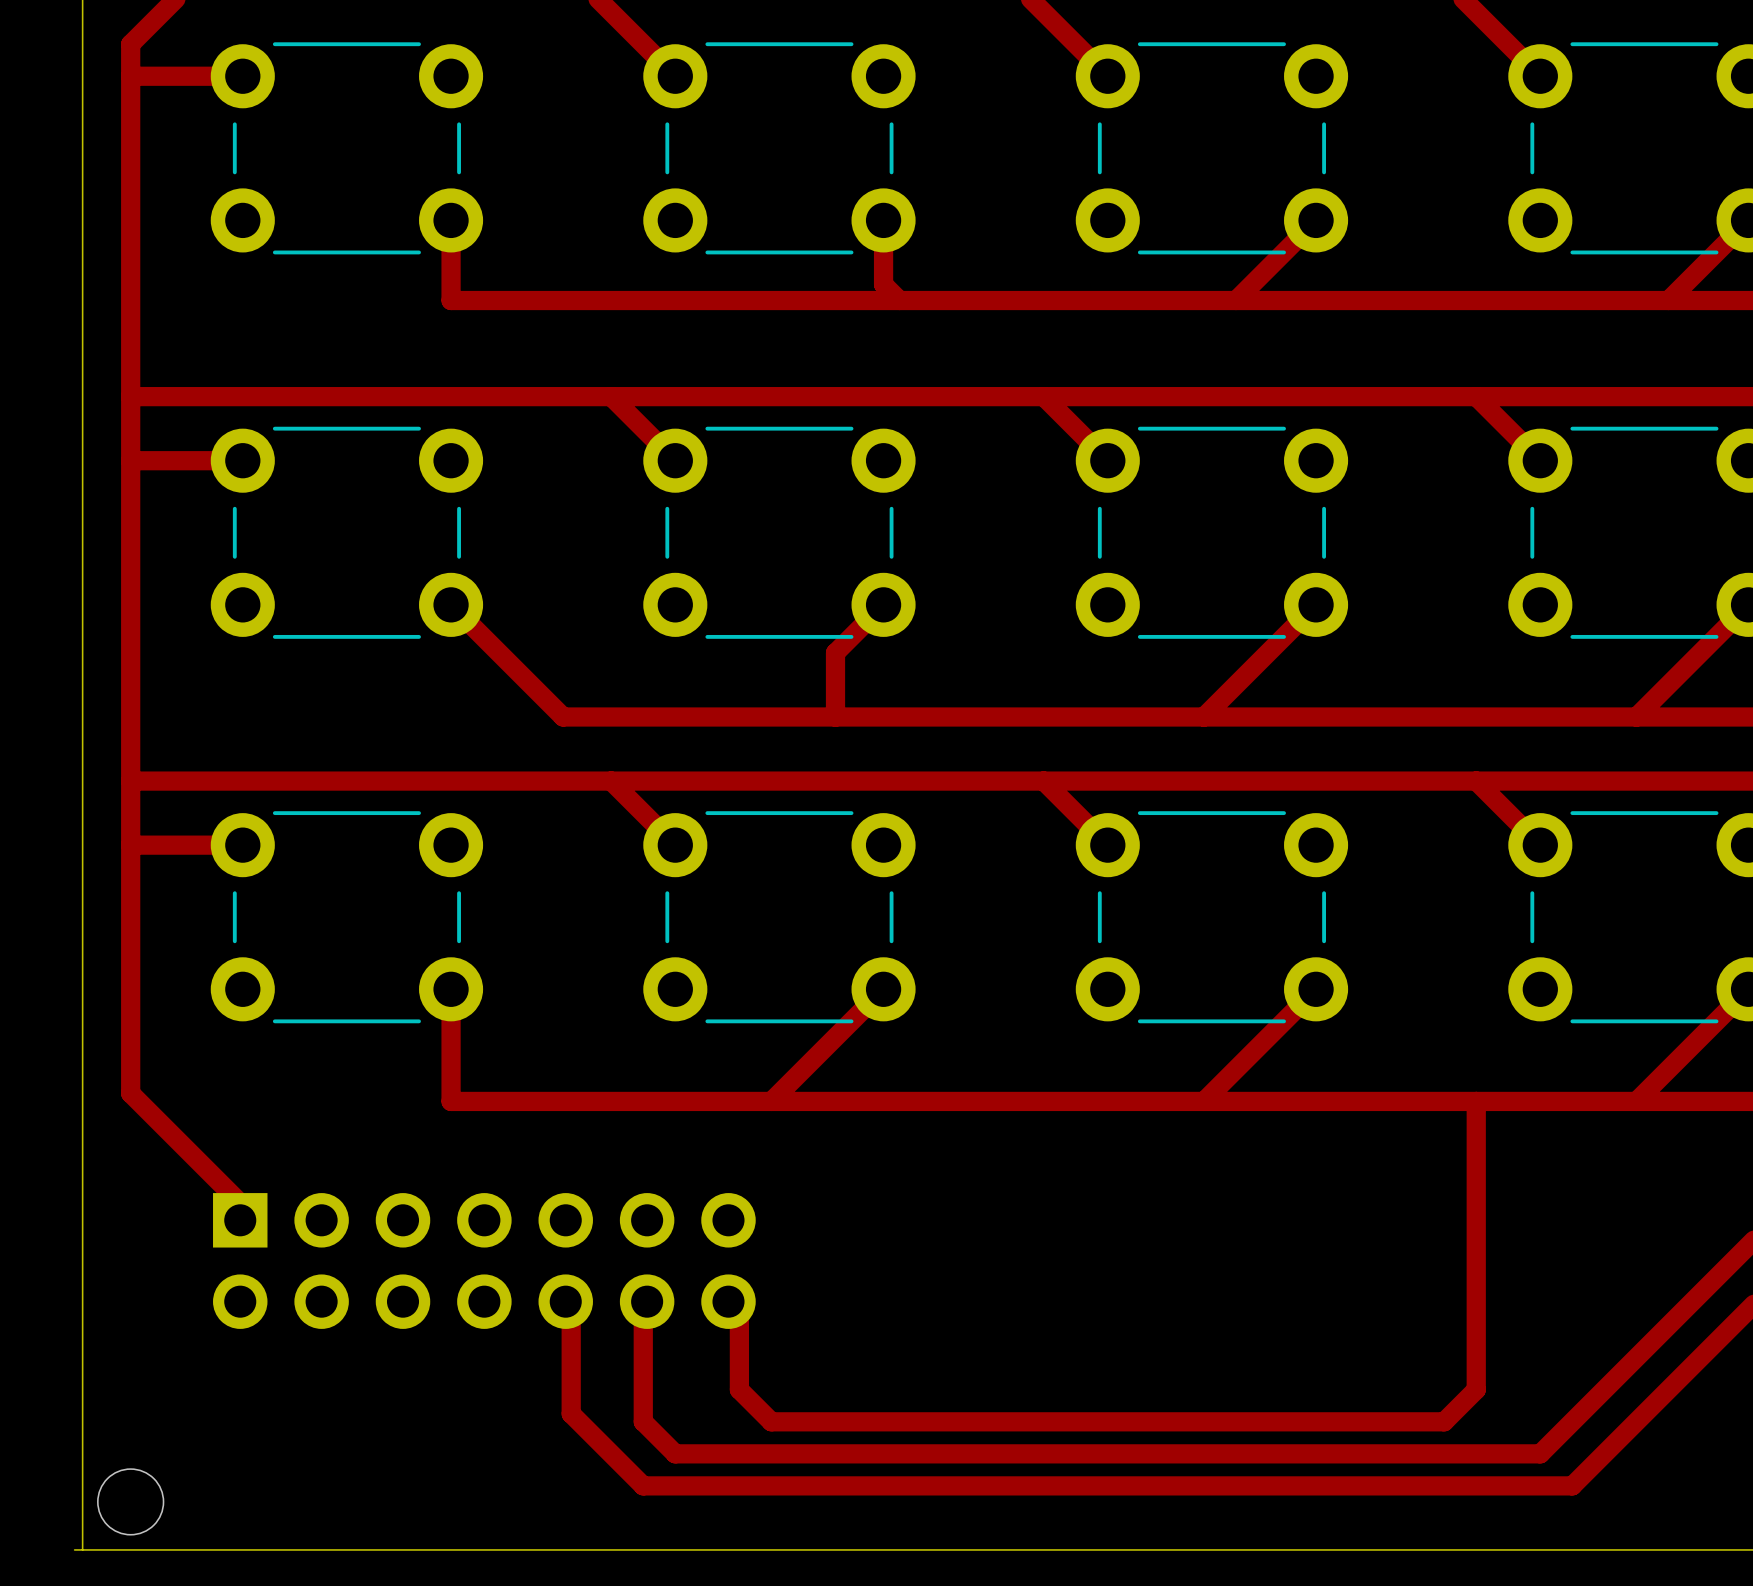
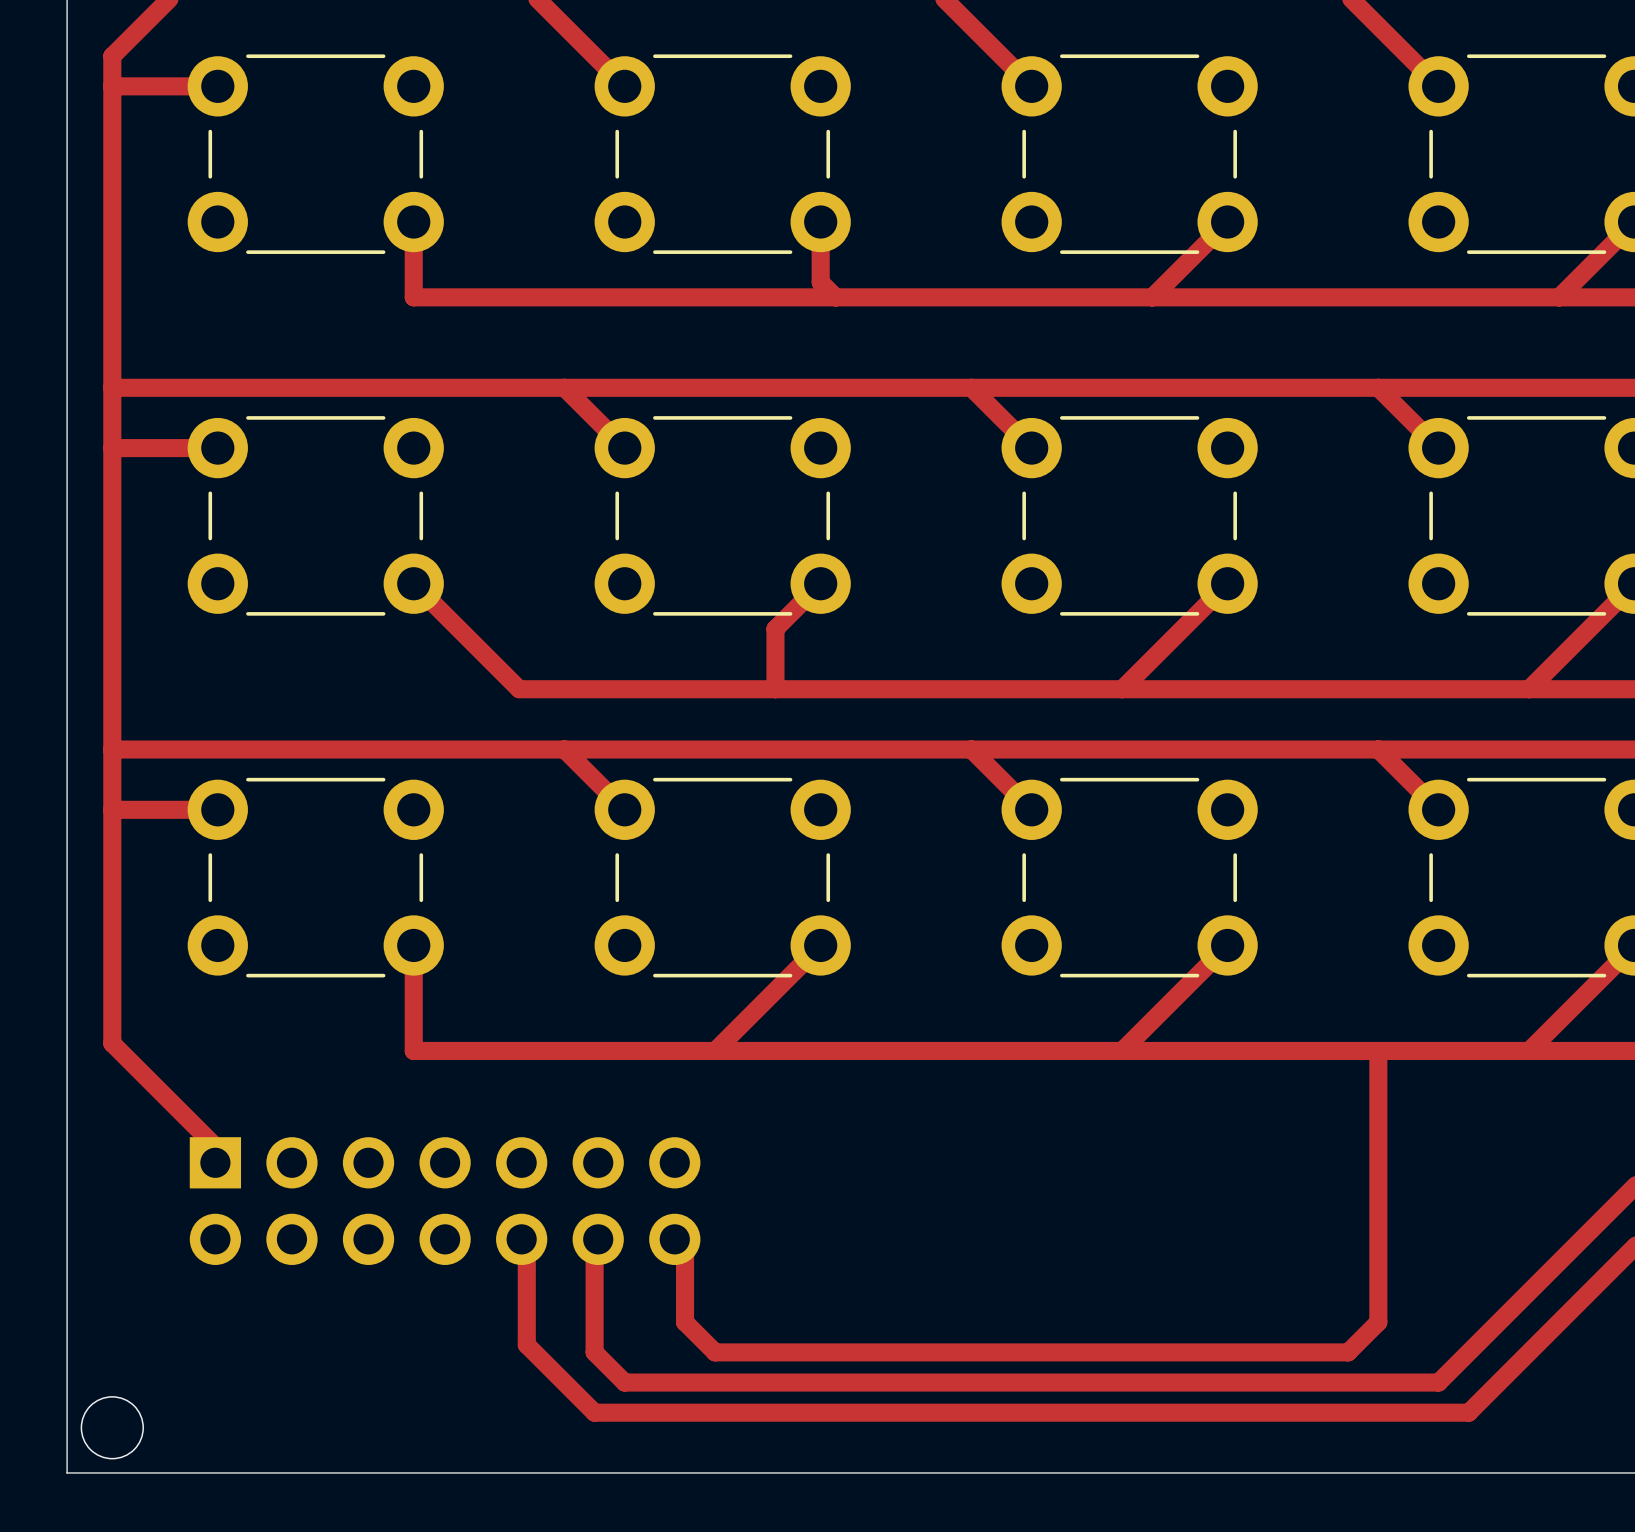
board edge: (74, 1549) (82, 1549) -> none

